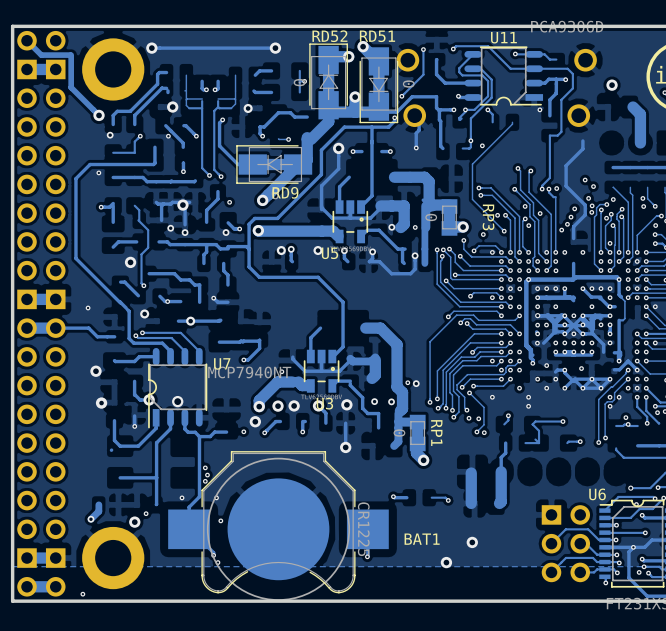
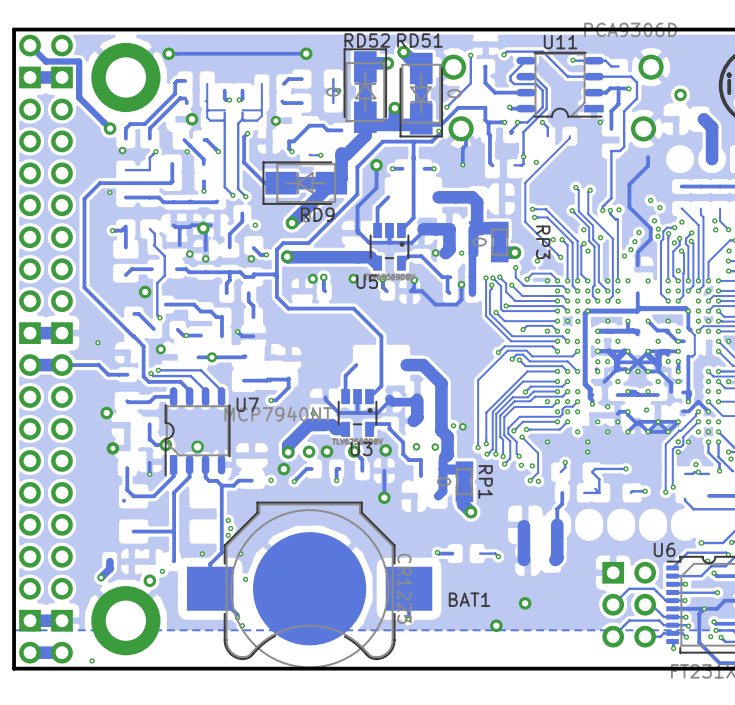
via: (537, 288) -> none
via: (555, 288) -> none
via: (591, 288) -> none
via: (610, 288) -> none
via: (573, 315) -> none
via: (564, 324) -> none
via: (582, 324) -> none
via: (564, 342) -> none
via: (573, 342) -> none
via: (582, 342) -> none
via: (537, 343) -> none
via: (555, 352) -> none
via: (573, 352) -> none
via: (591, 352) -> none

